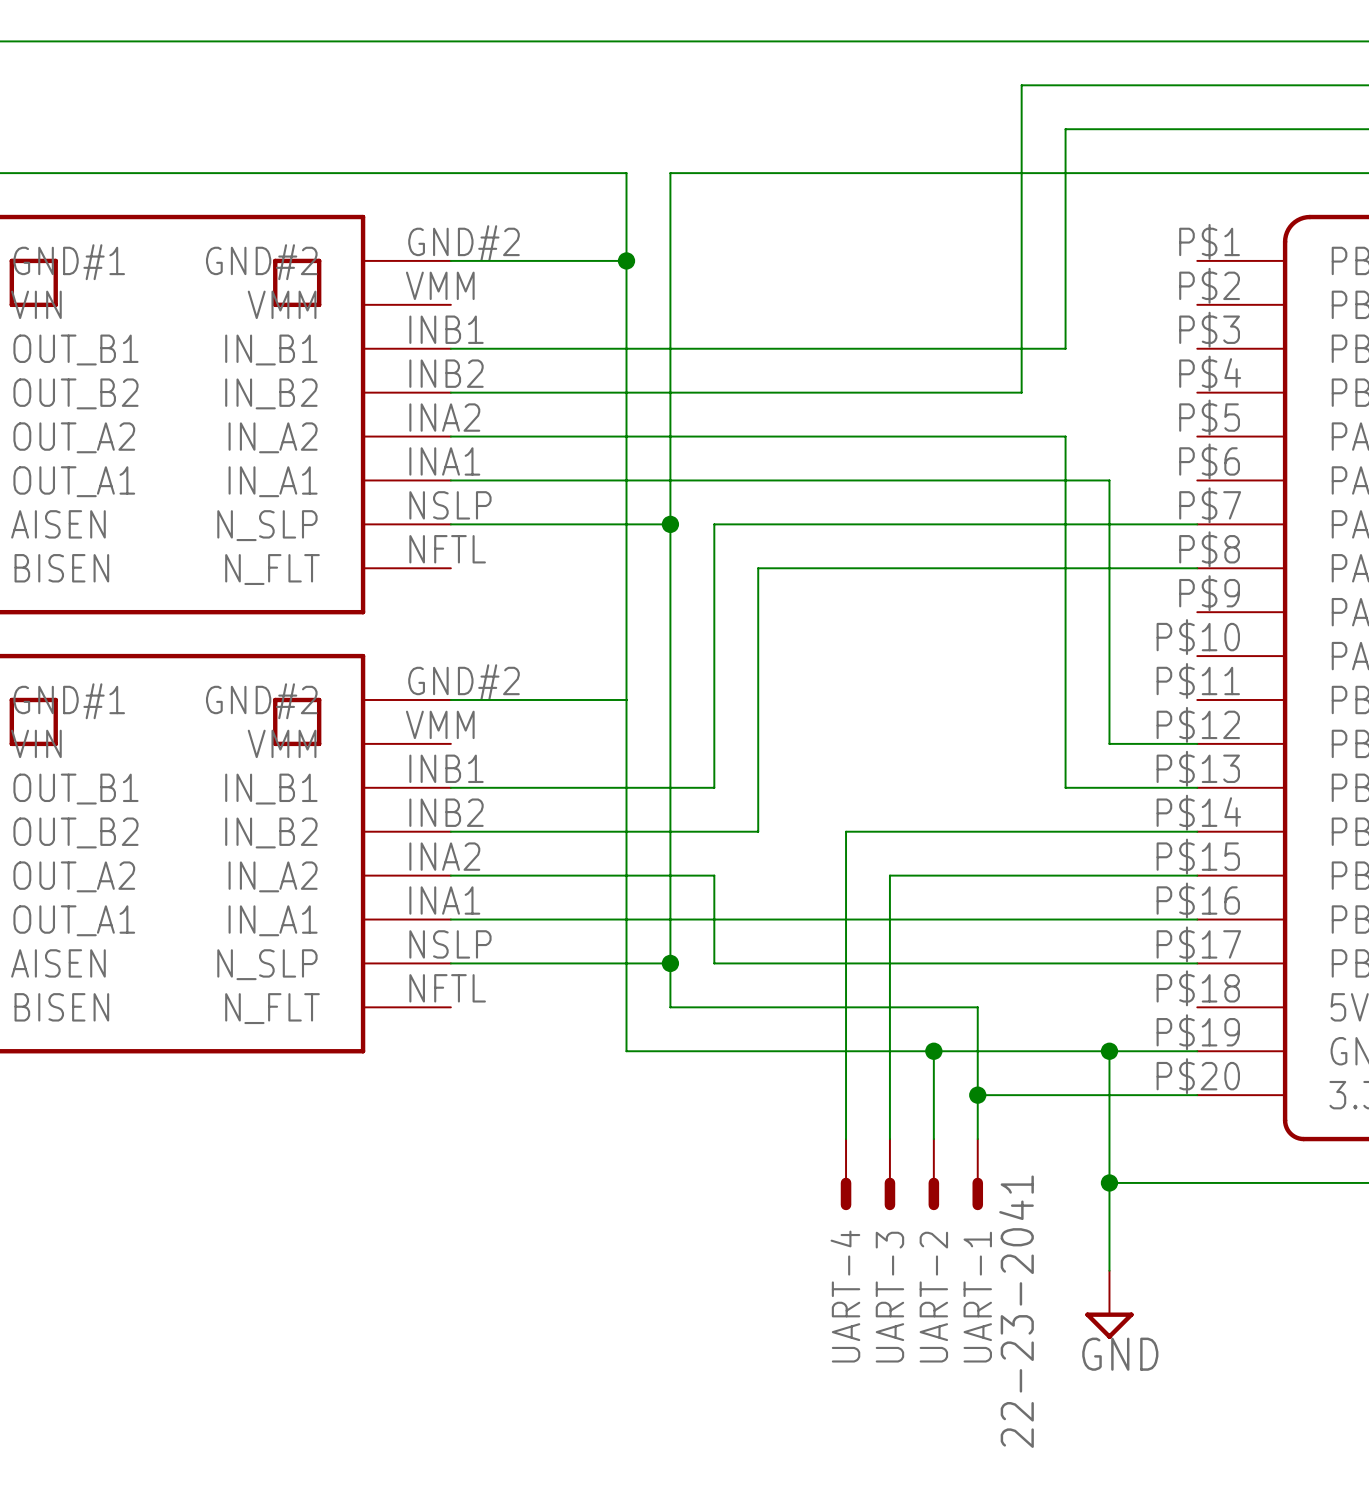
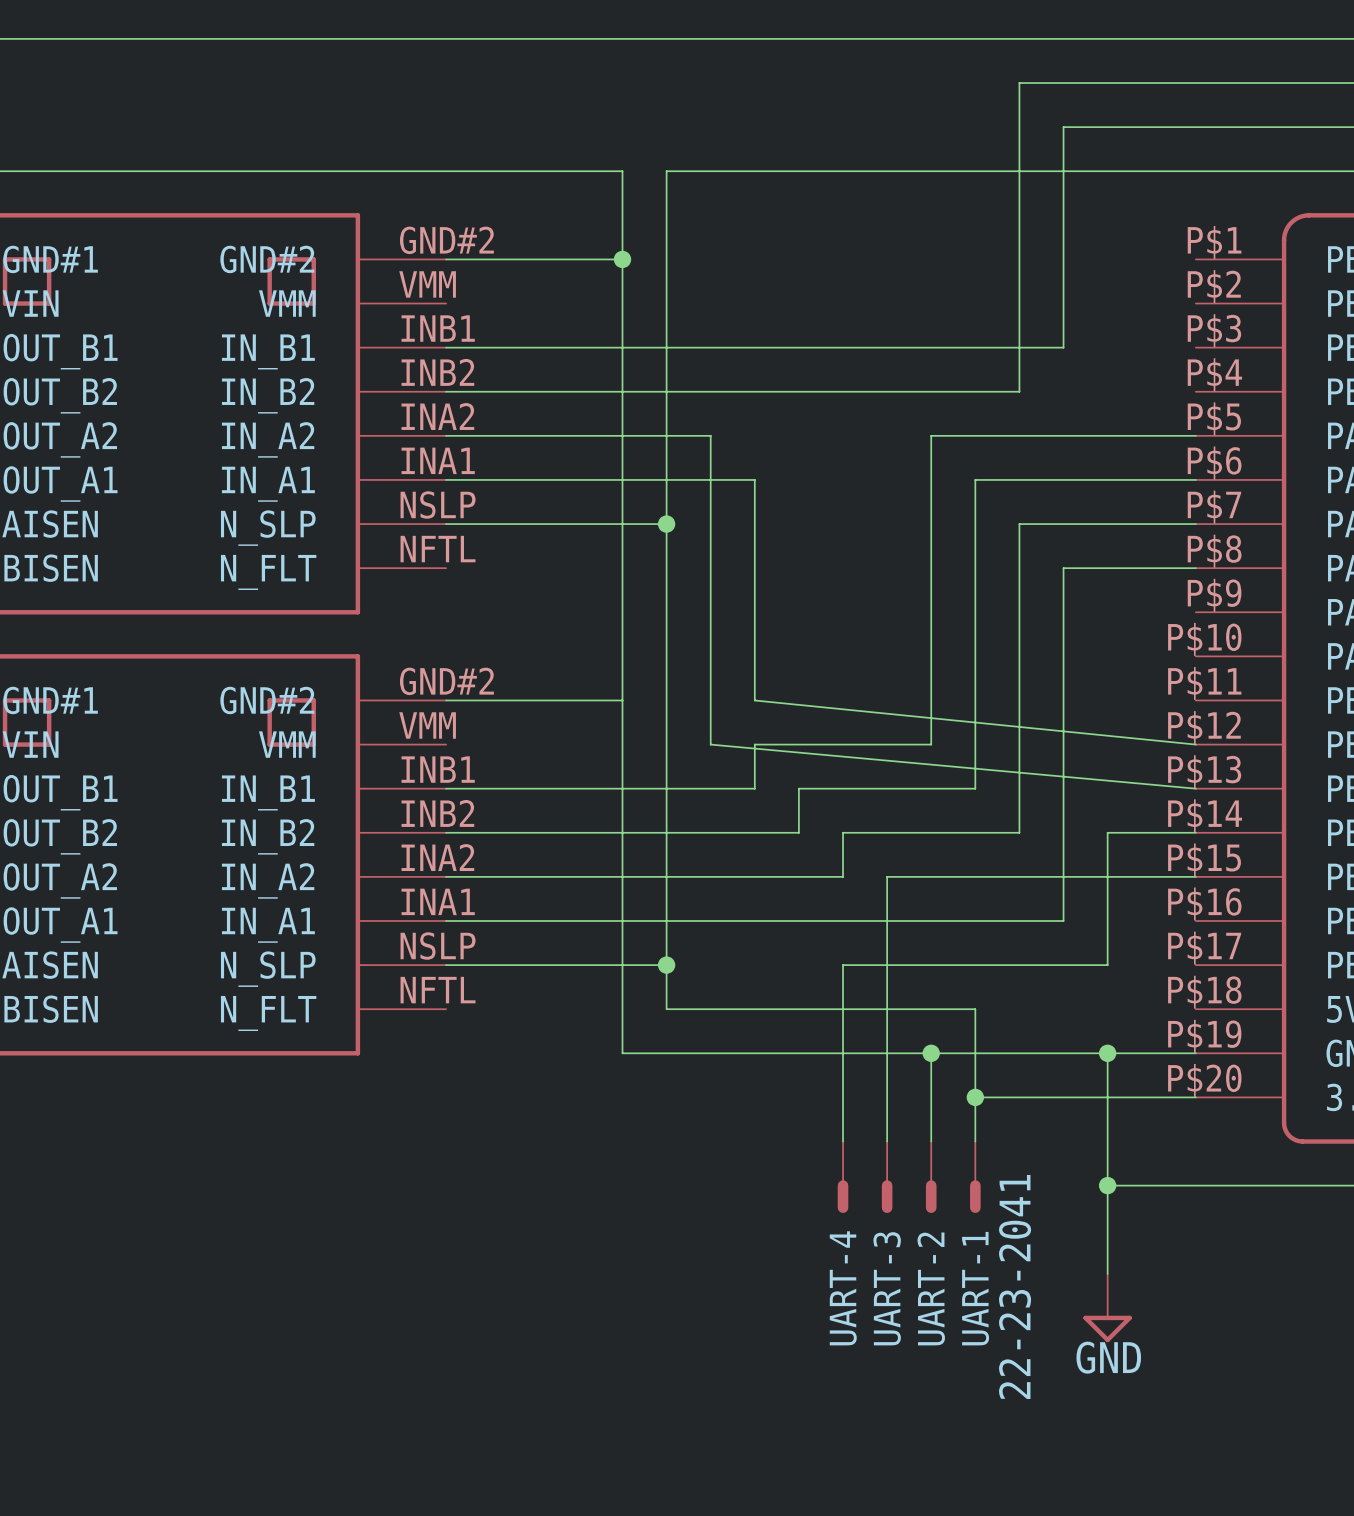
wire: (714, 436) (933, 436) -> (710, 435) (710, 524)
wire: (1065, 436) (1065, 568) (758, 568) -> (1063, 435) (1195, 435)
wire: (758, 480) (977, 480) -> (754, 479) (754, 568)
wire: none -> (975, 479) (975, 788) (798, 788) (798, 832) (754, 832)
wire: (1109, 480) (1109, 743) (1197, 743) -> (1107, 479) (1195, 479)
wire: (714, 524) (1021, 524) -> (1019, 832) (1019, 524)
wire: (758, 699) (758, 743) -> (931, 435) (931, 744) (754, 744)
wire: none -> (754, 700) (1195, 744)
wire: (714, 743) (714, 787) -> (710, 744) (1195, 788)
wire: (758, 787) (758, 831) -> (754, 788) (710, 788)
wire: (1065, 787) (1197, 787) -> (1063, 788) (1063, 920)
wire: (1021, 831) (1109, 831) -> (1107, 965) (1107, 832)
wire: (714, 875) (714, 963) (846, 963) (846, 875) -> (710, 876) (843, 876)
wire: (1065, 919) (1197, 919) -> none
wire: (1109, 963) (1197, 963) -> none

